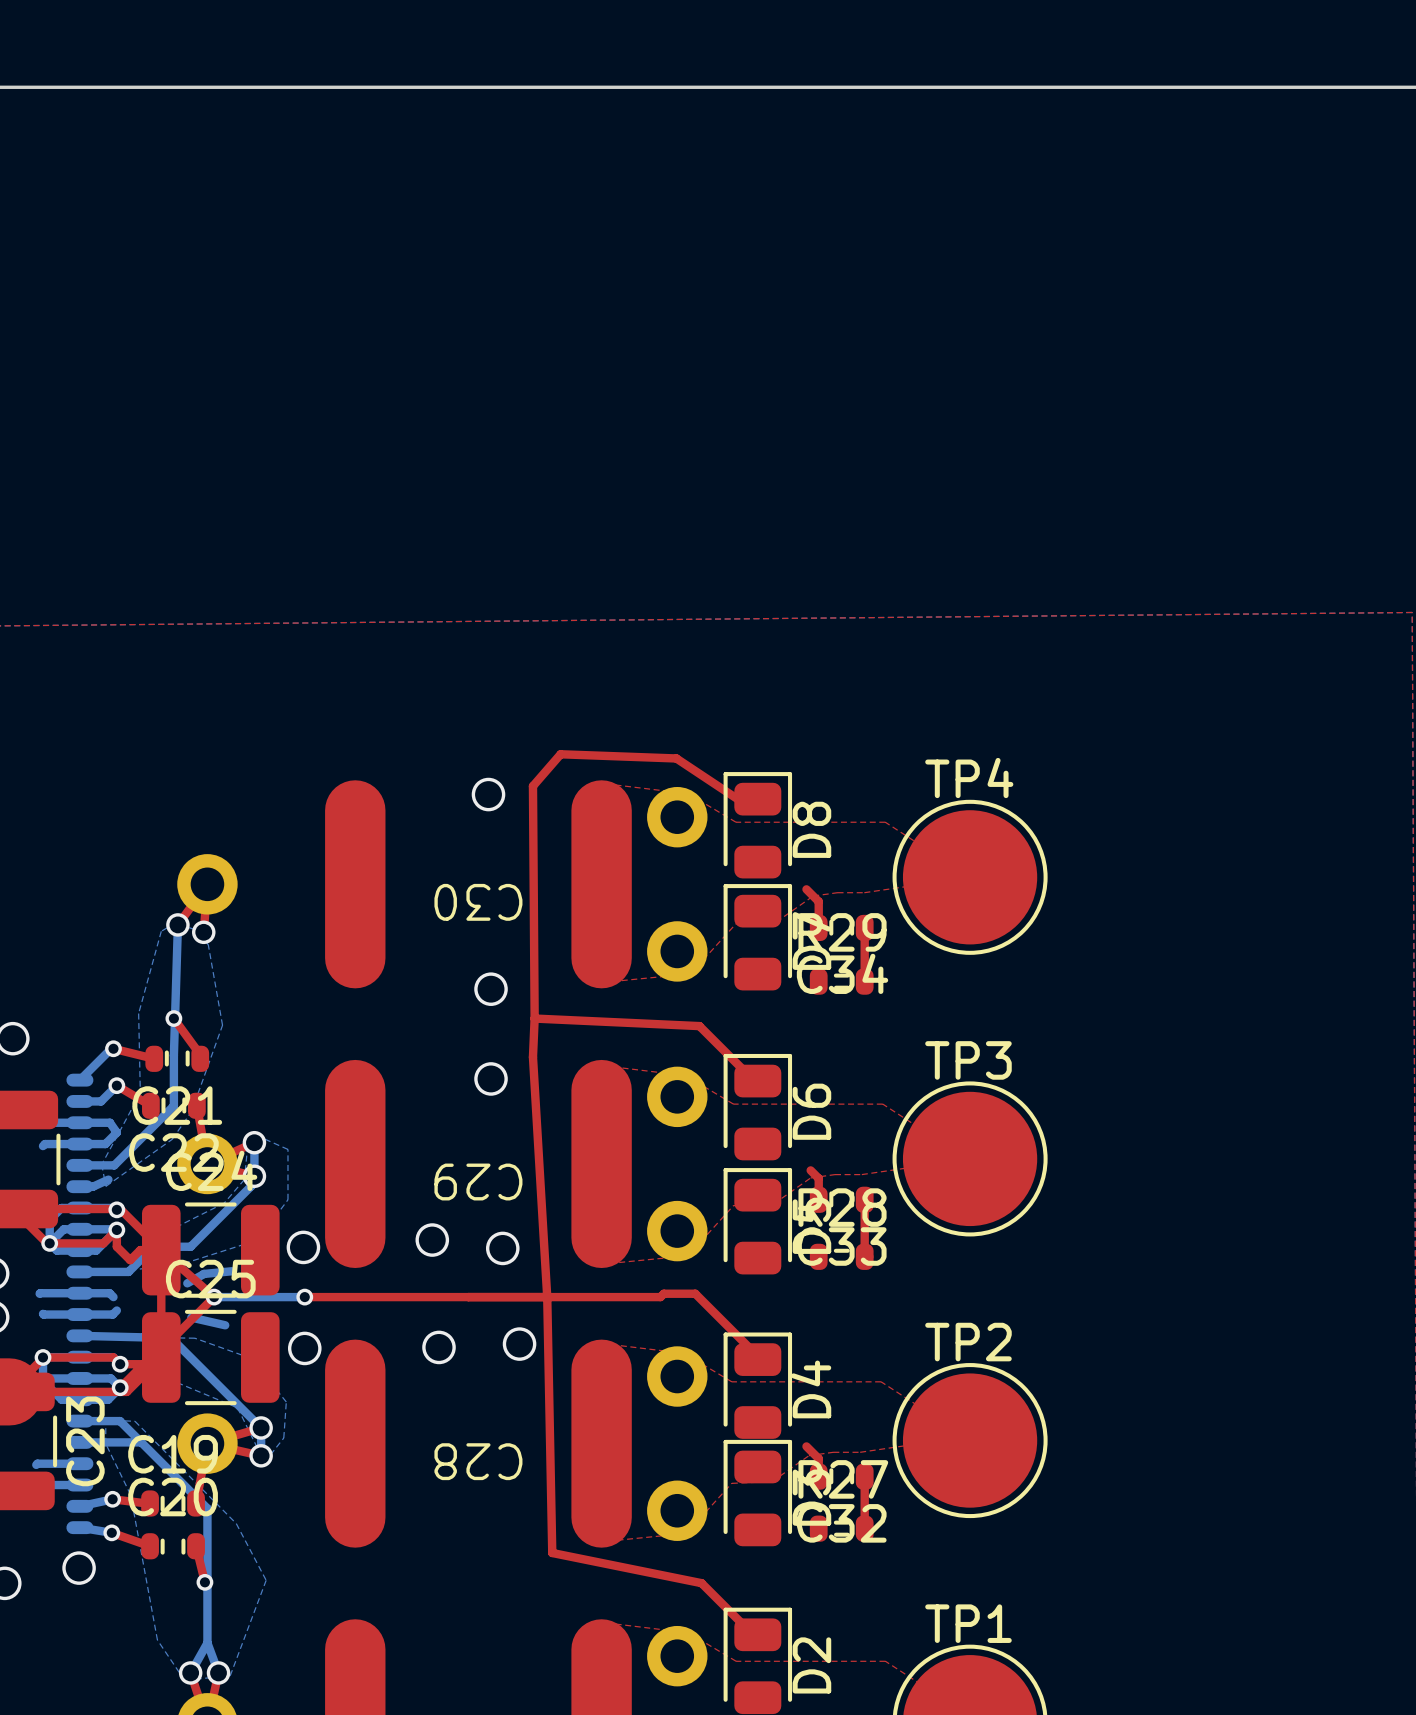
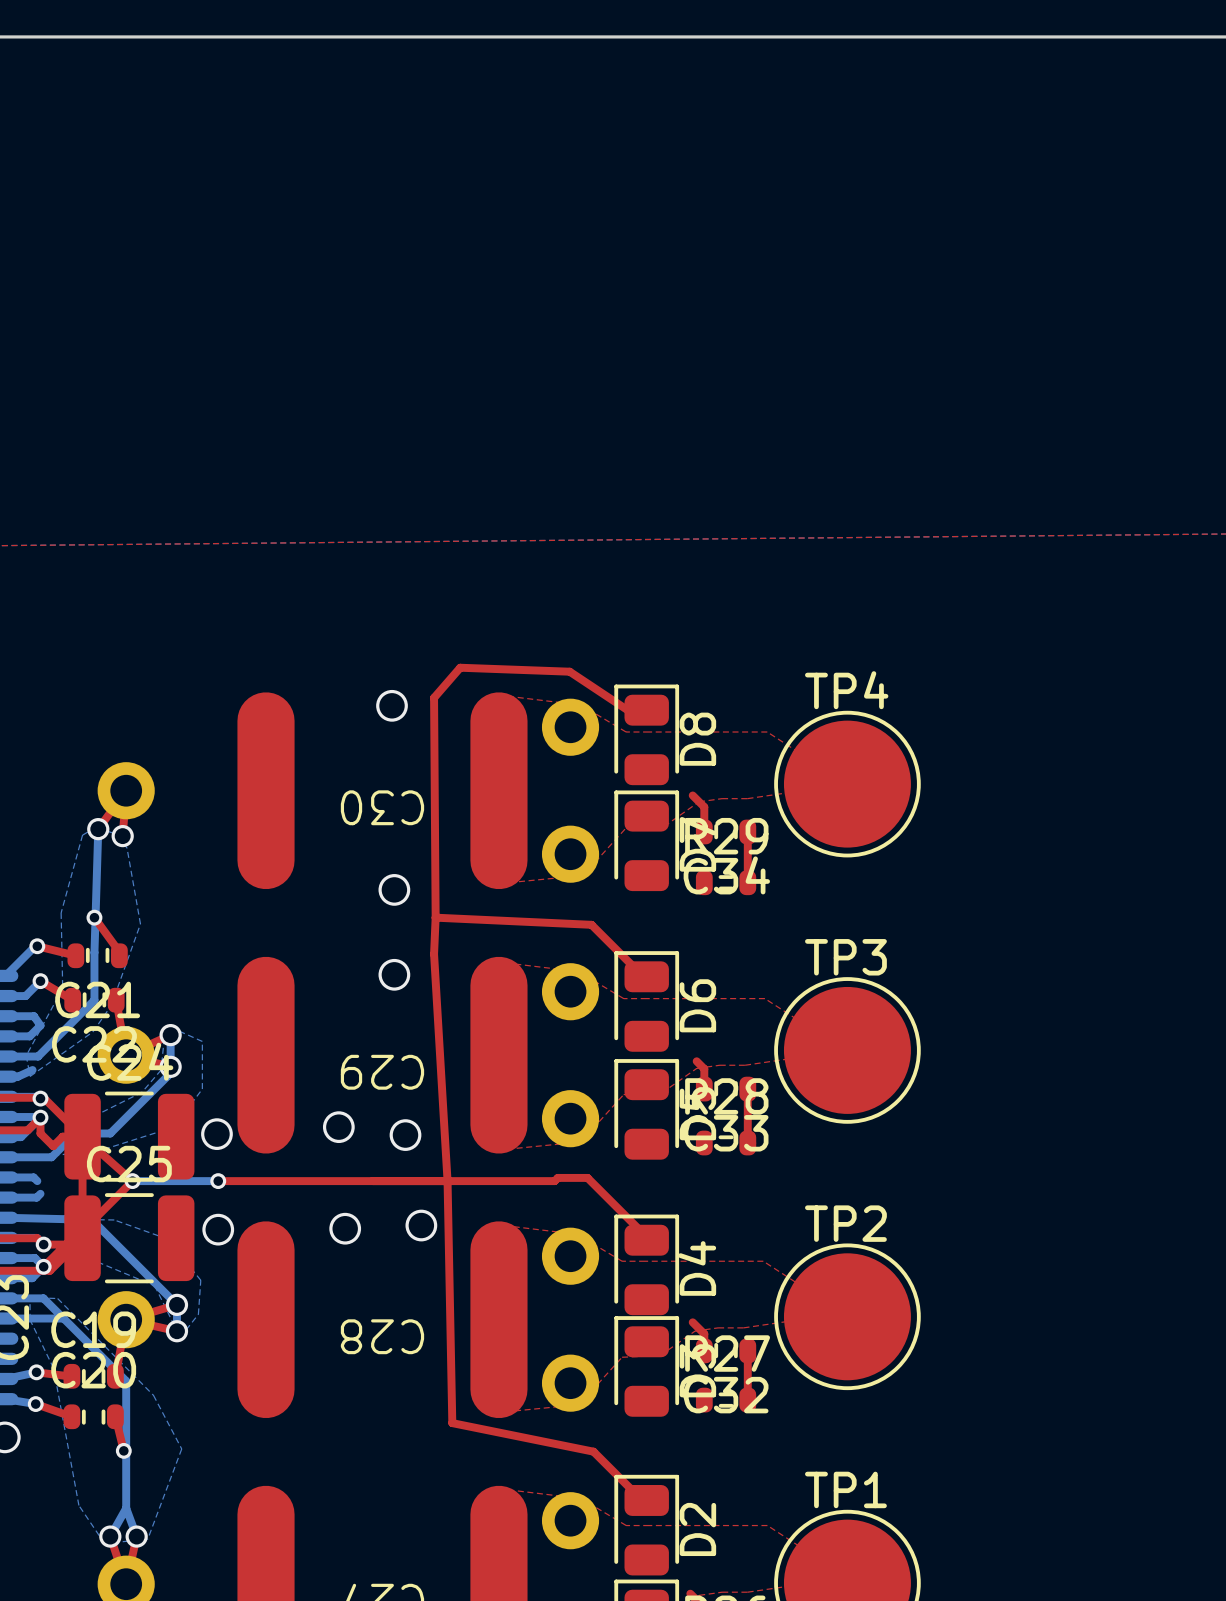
bottom track: (231, 1271) (204, 1273) (187, 1283) -> none
bottom track: (191, 1317) (225, 1325) -> none

